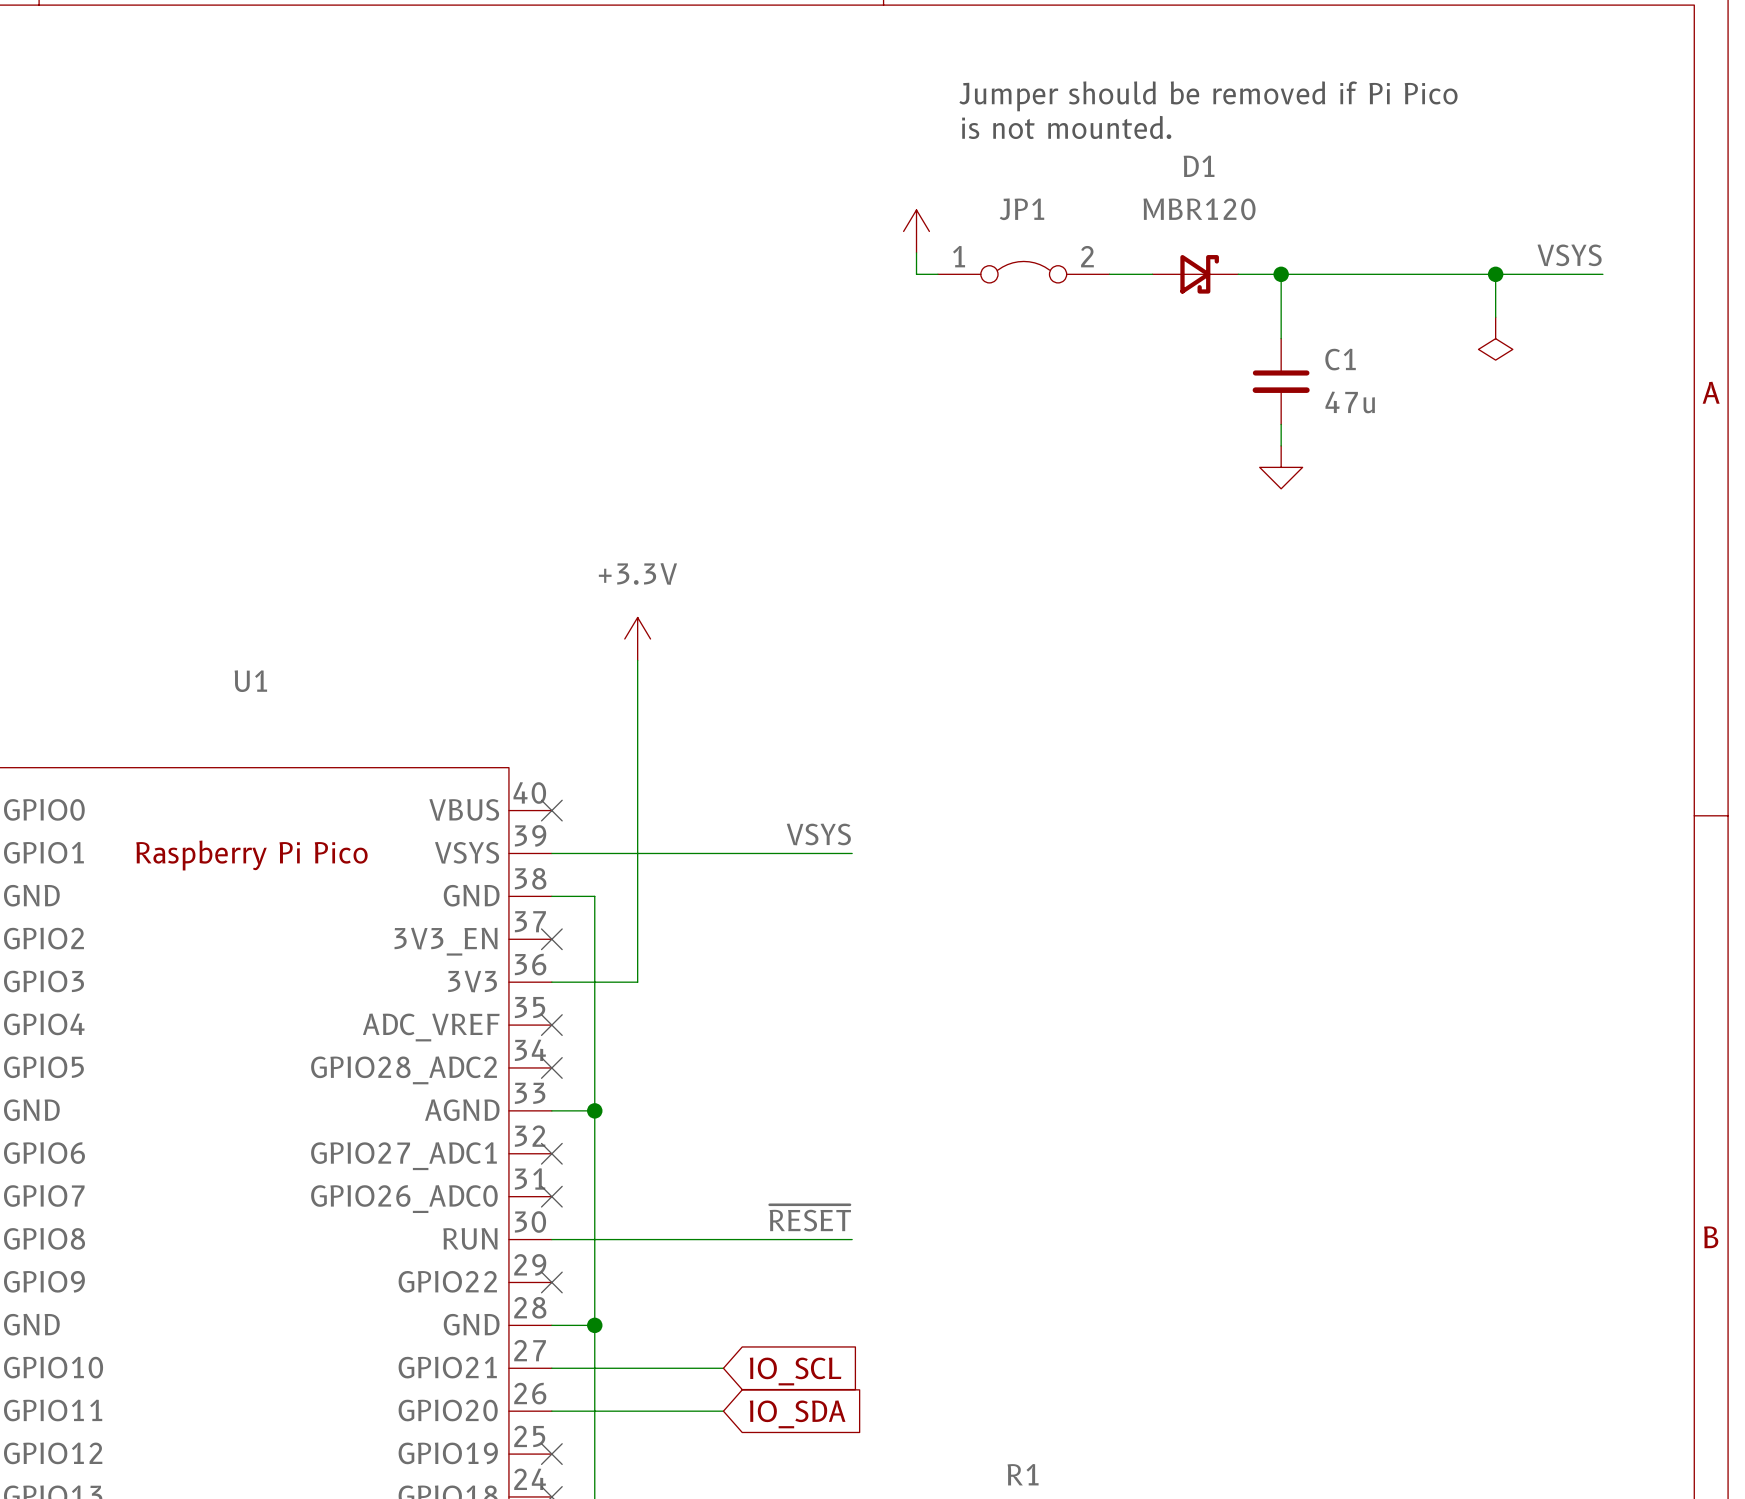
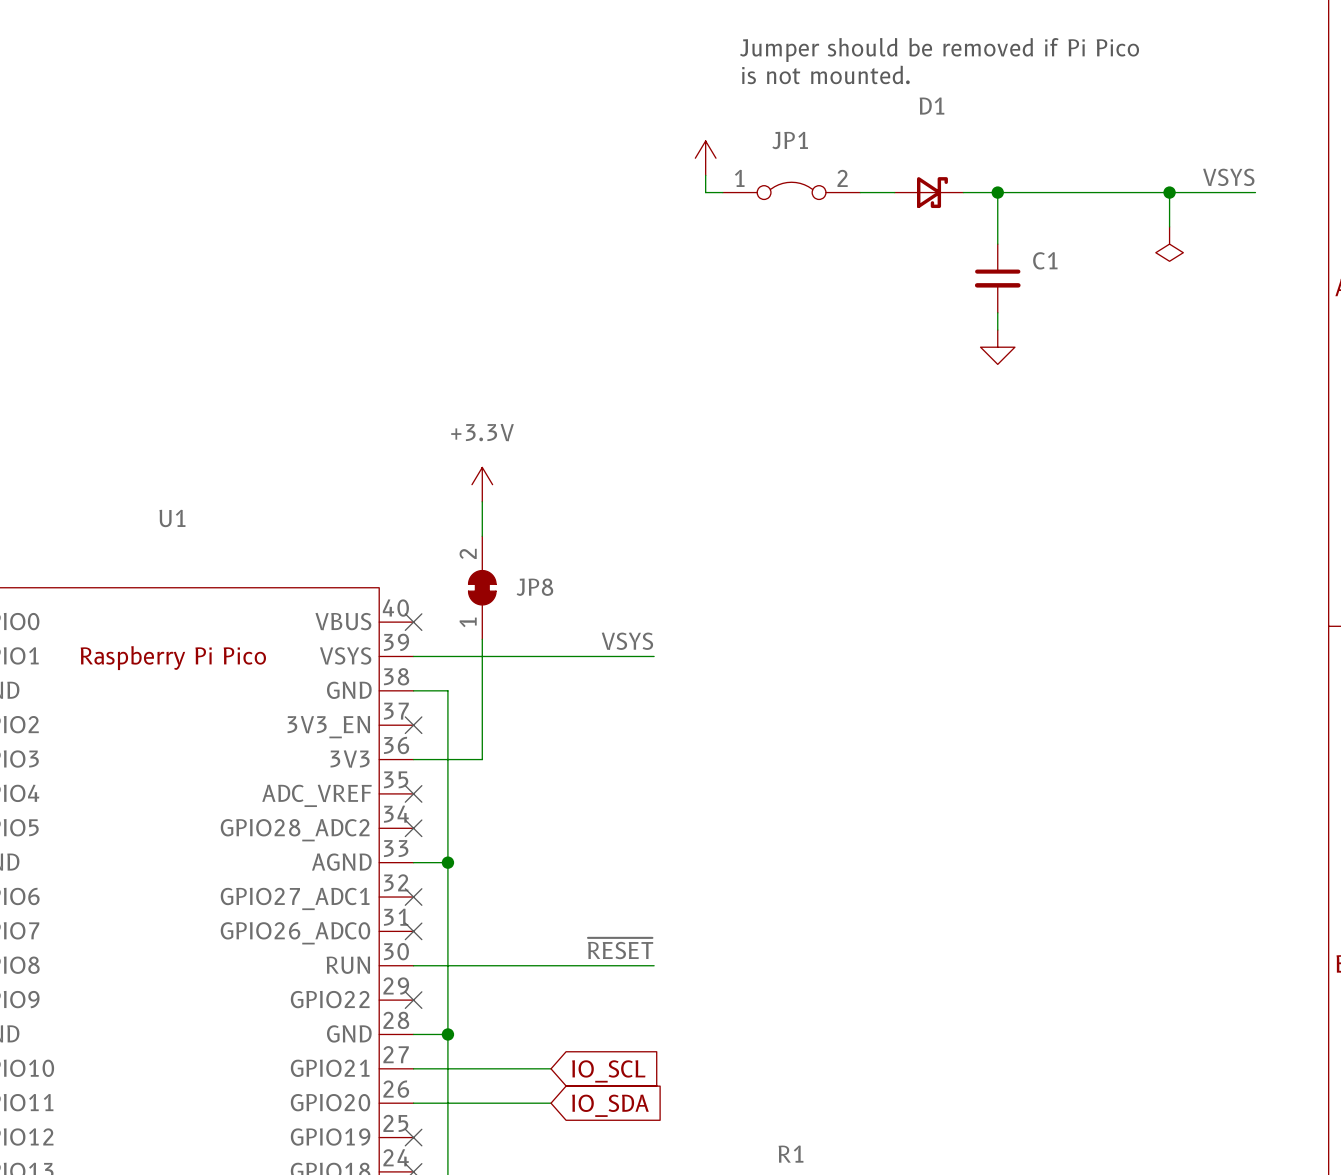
D1 value: MBR120 (1199, 209) -> none
C1 value: 47u (1350, 402) -> none
JP8: none -> (482, 587)

